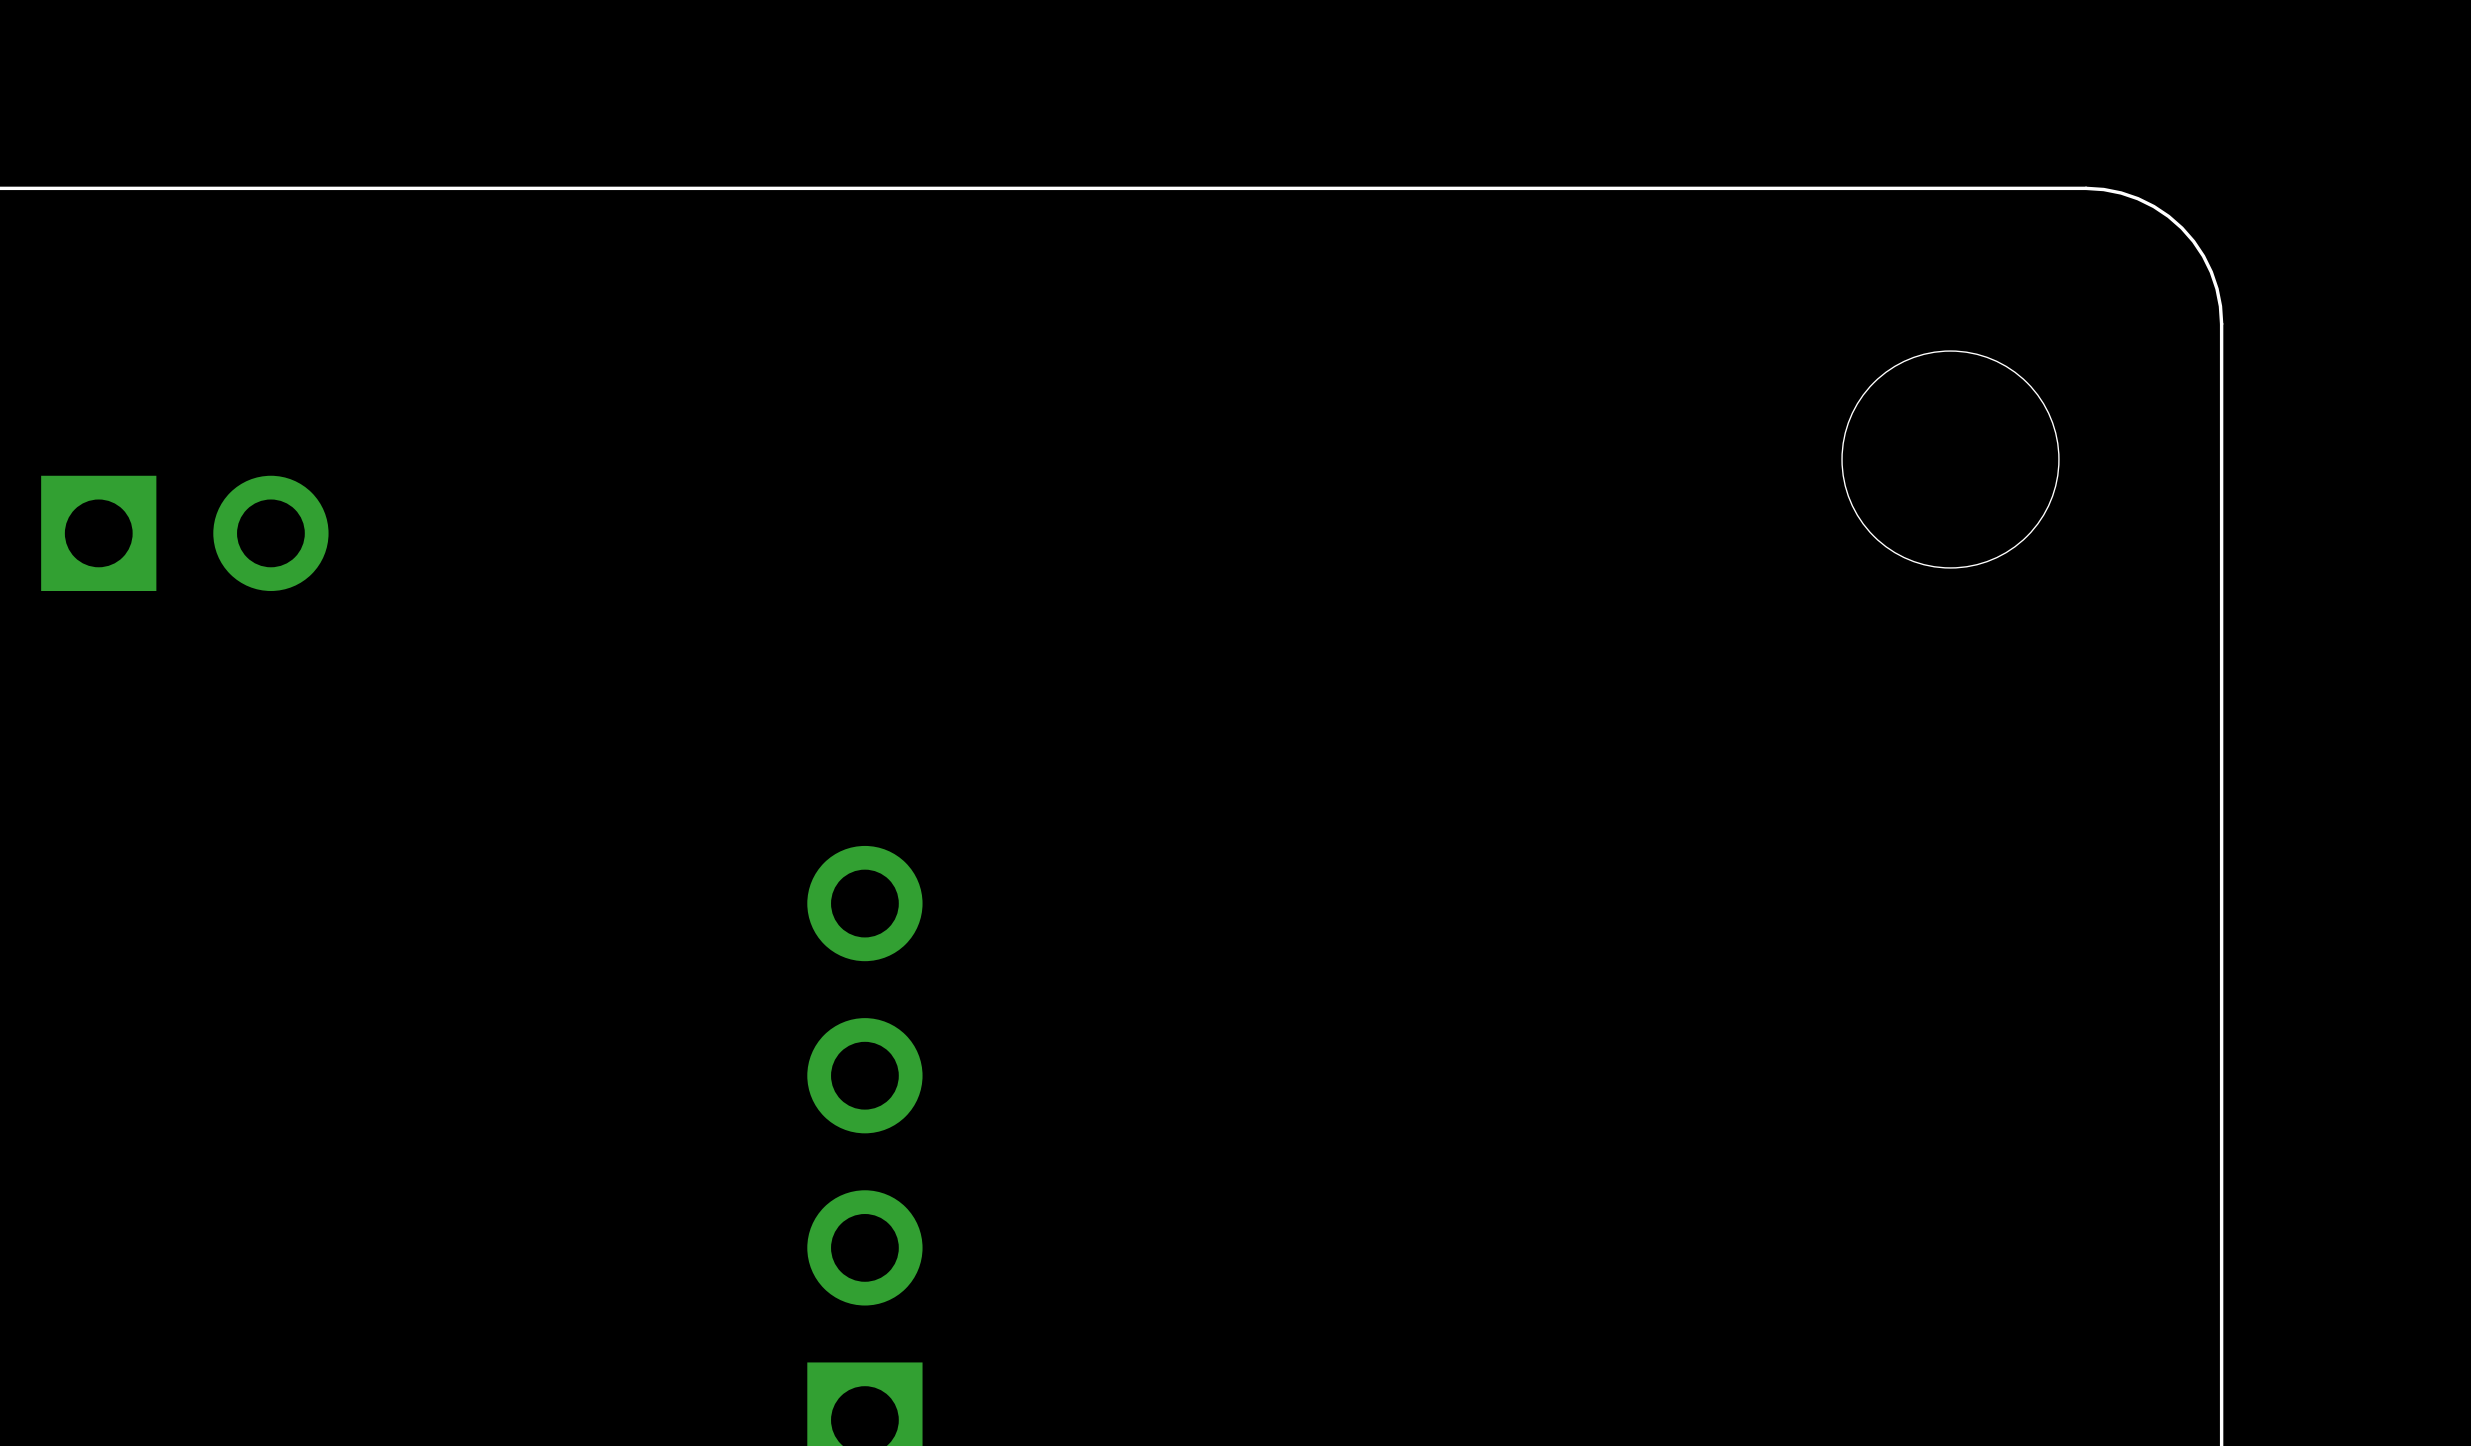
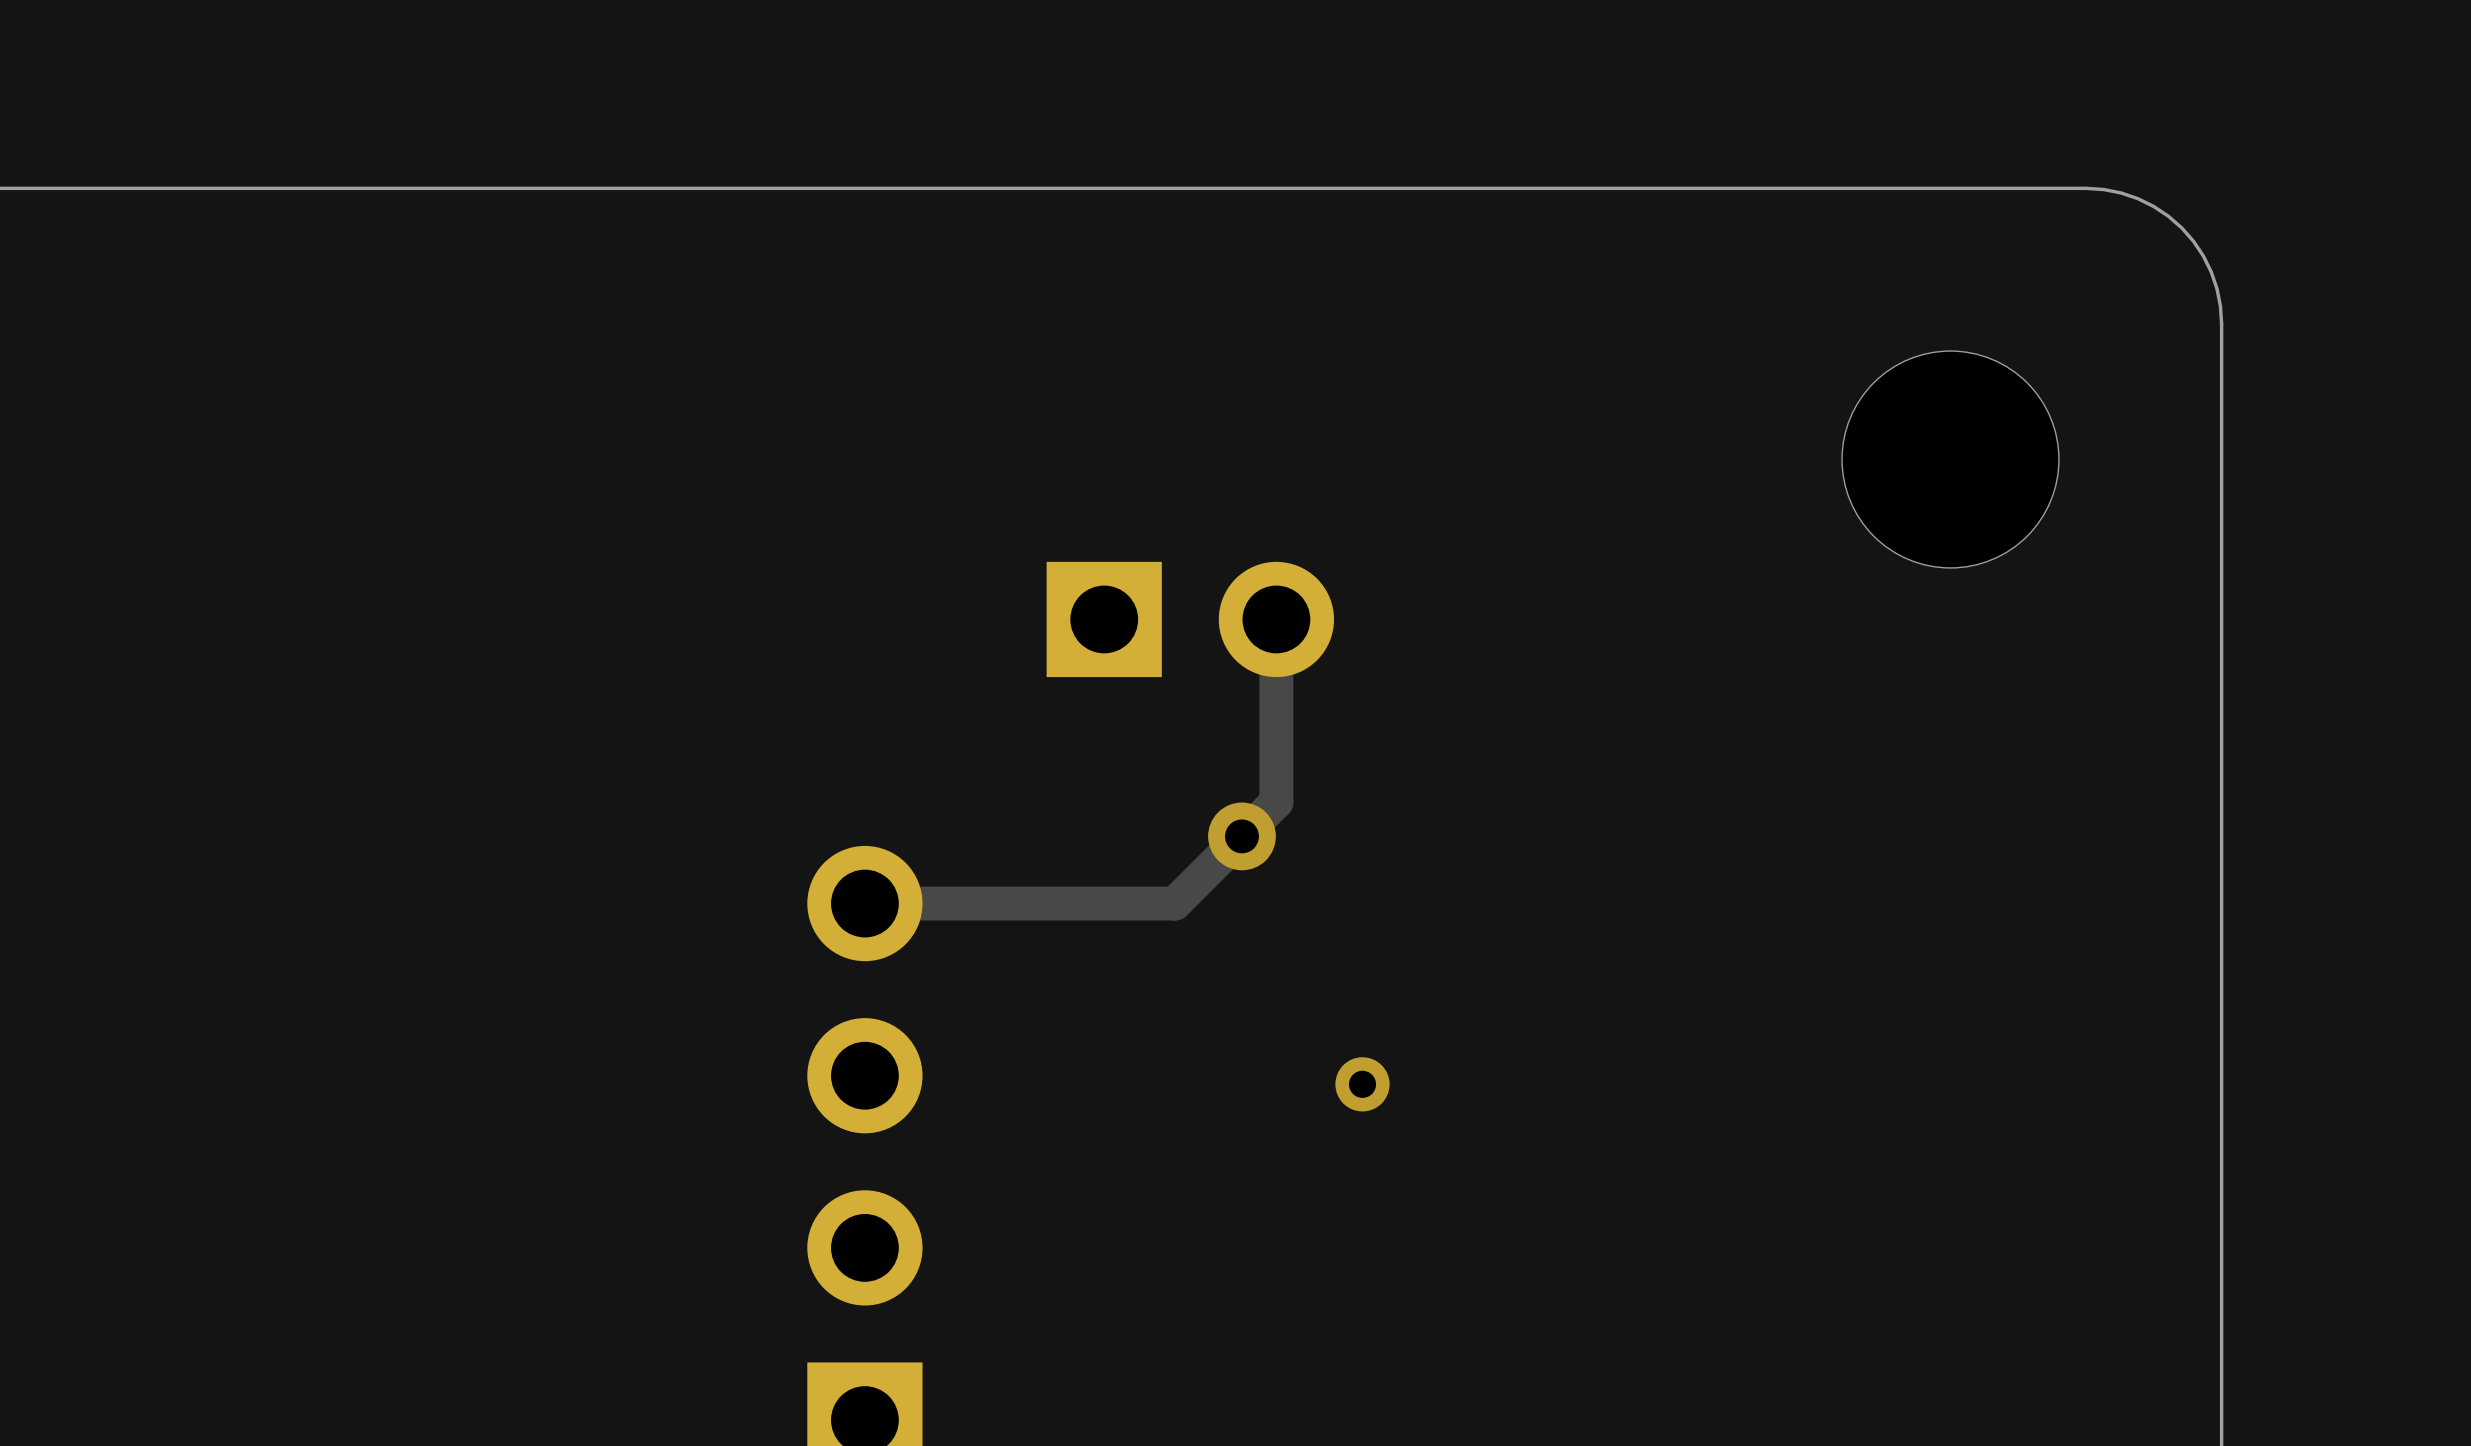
part position: (184, 533) -> (1190, 619)
track: none -> (1276, 612) (1276, 801) (1174, 903) (864, 903)
via: none -> (1241, 836)
via: none -> (1362, 1084)

